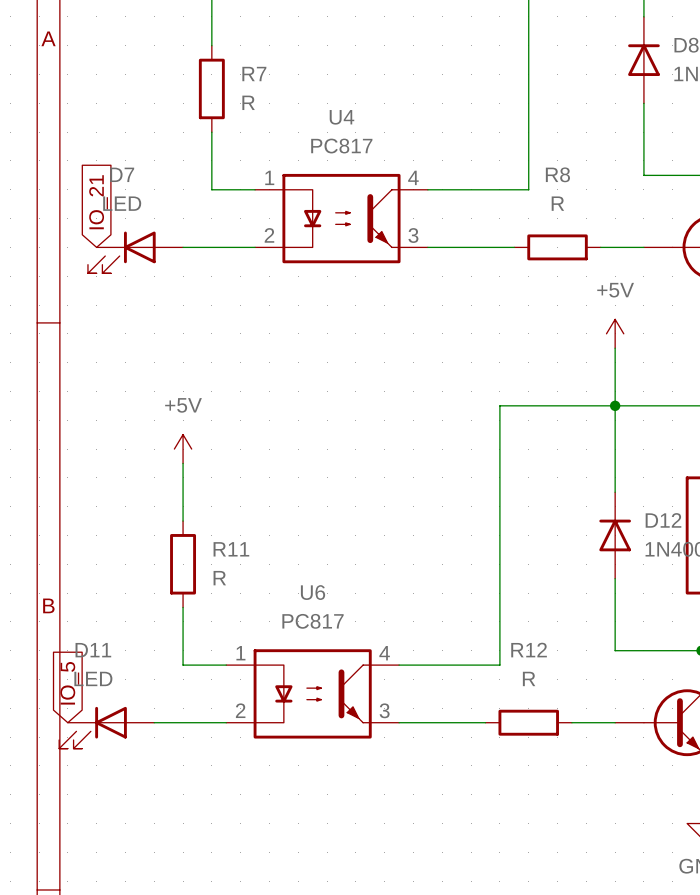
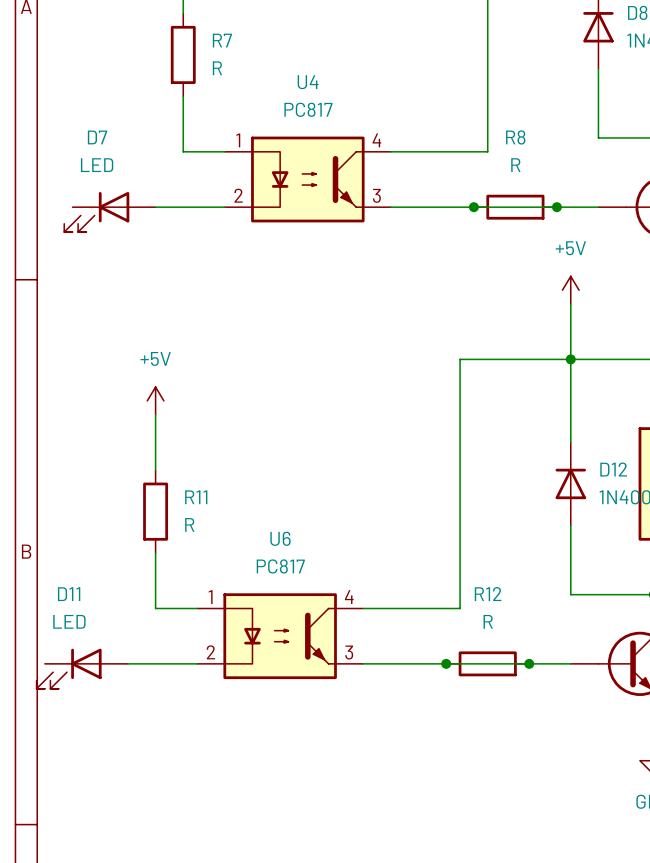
global label: IO_21 (98, 202) -> none
wire: none -> (473, 207) (556, 207)
junction: none -> (473, 207)
junction: none -> (556, 207)
global label: IO_5 (69, 683) -> none
wire: none -> (446, 663) (529, 663)
junction: none -> (446, 663)
junction: none -> (529, 663)

